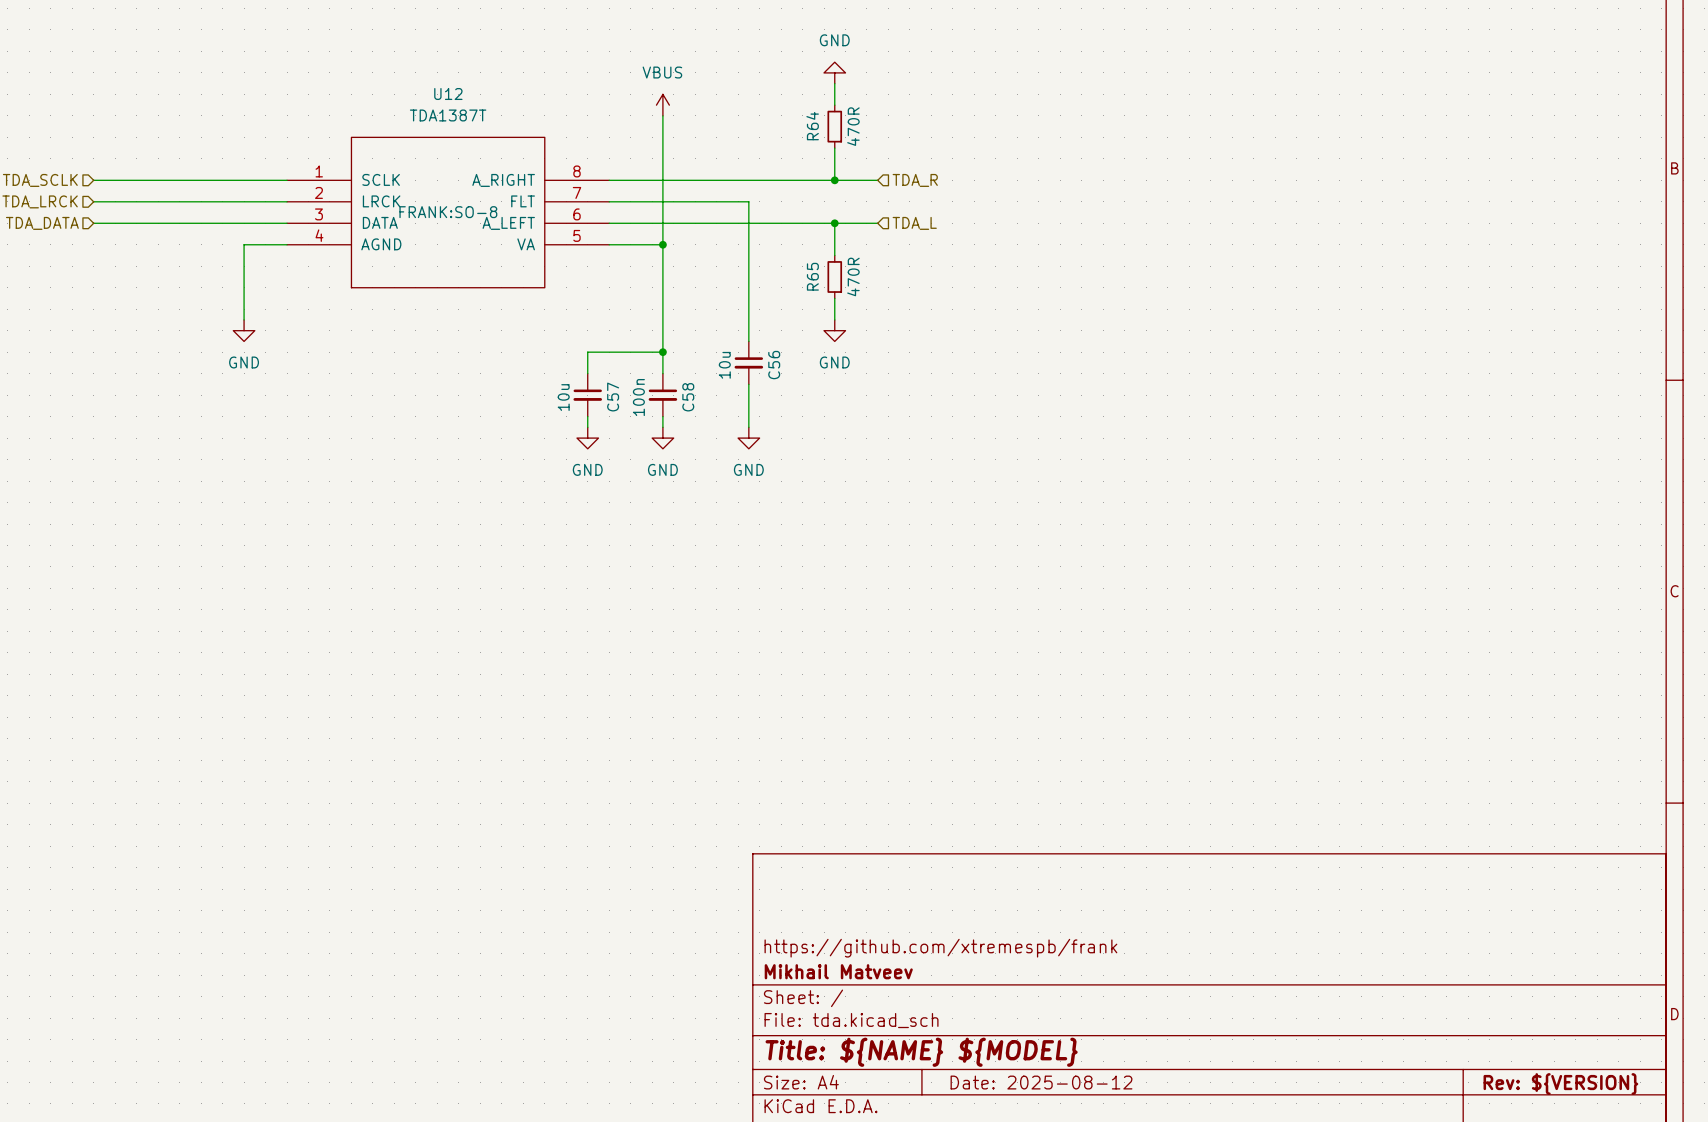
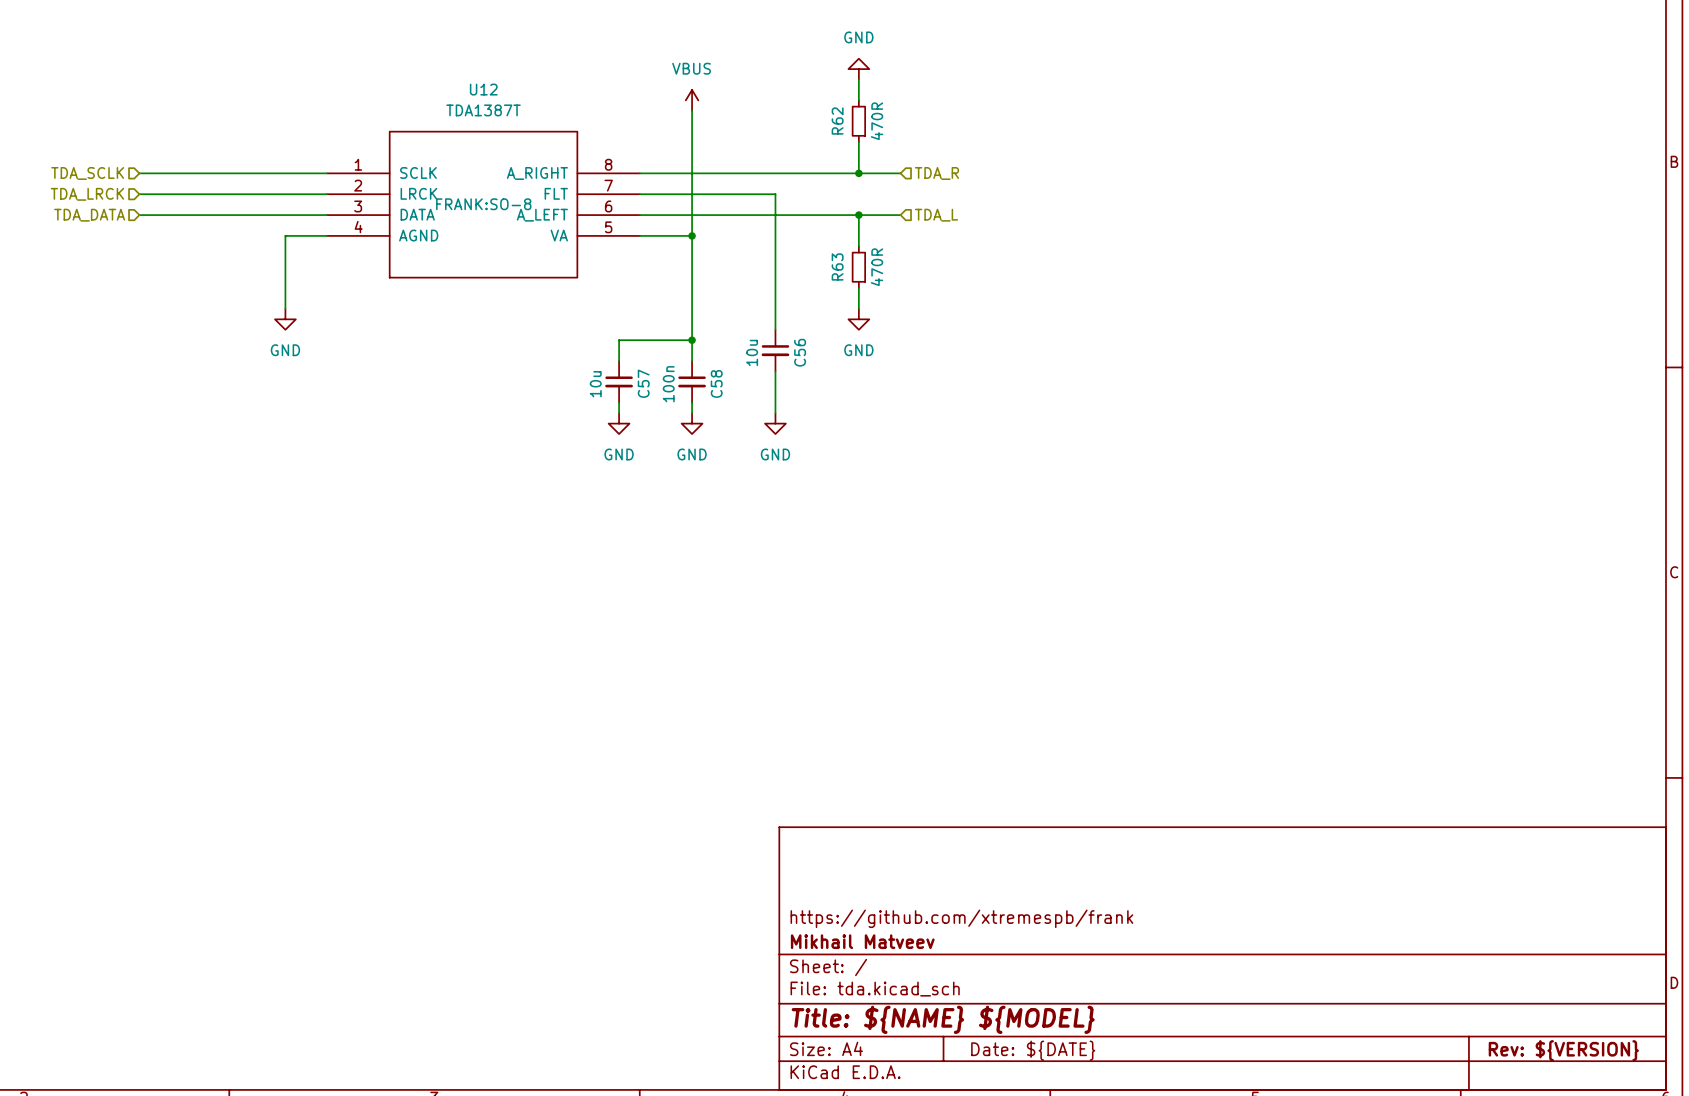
R64 name: R64 (812, 126) -> R62 (837, 120)
R65 name: R65 (812, 276) -> R63 (837, 266)
title block: Date: 2025-08-12 (1041, 1082) -> Date: ${DATE} (1033, 1050)

